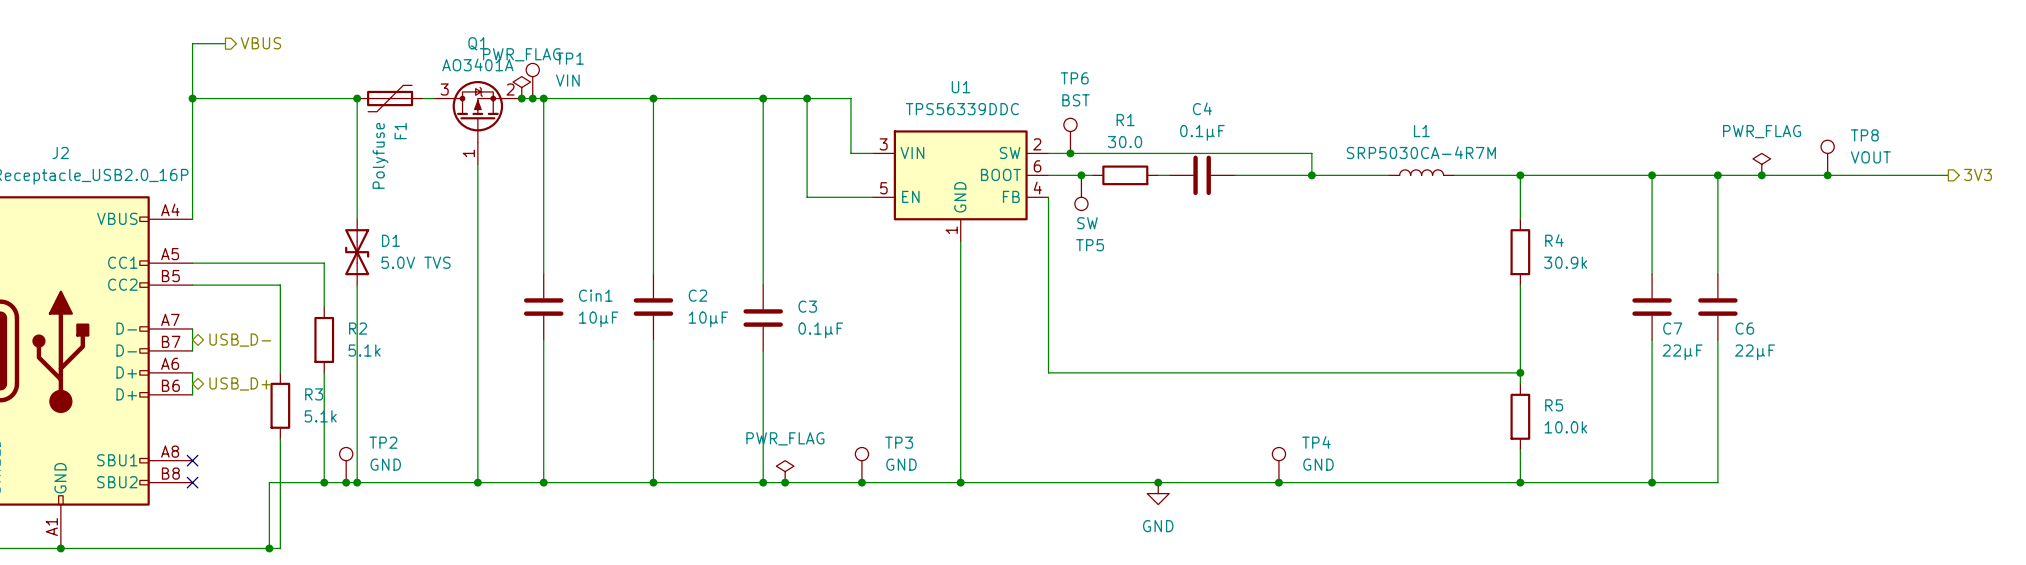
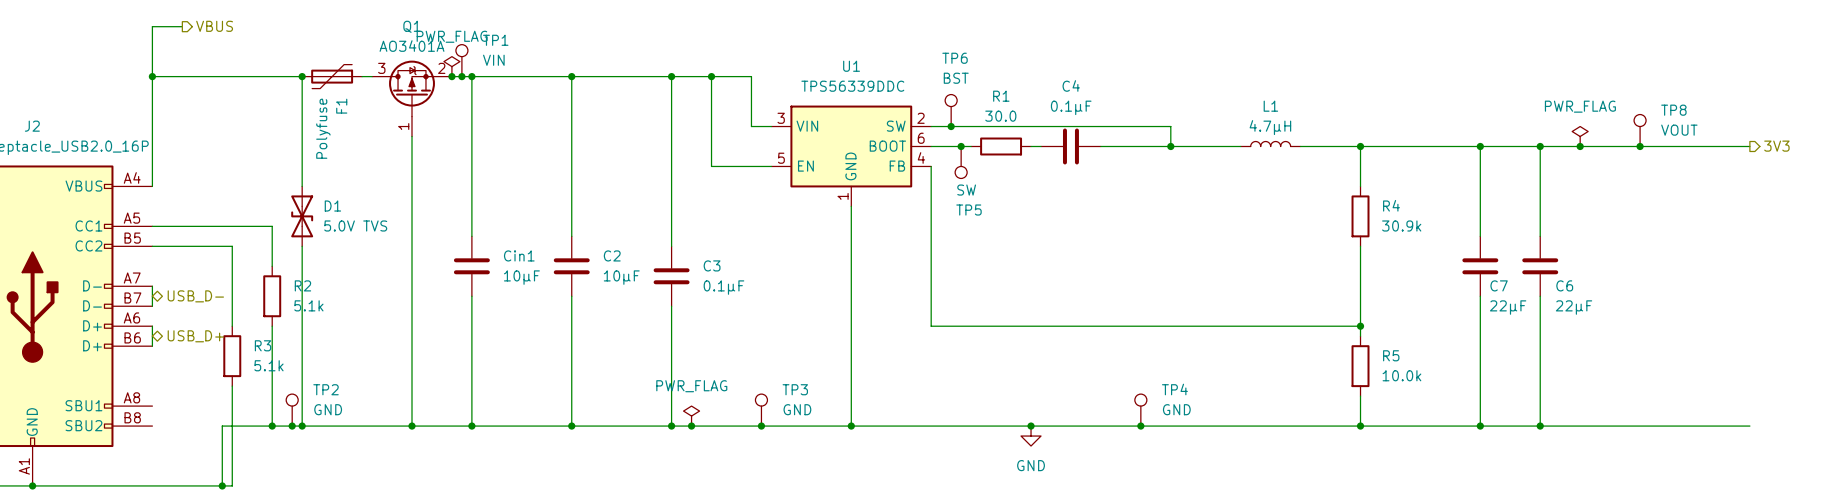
L1 value: SRP5030CA-4R7M (1421, 152) -> 4.7µH (1270, 127)
no-connect mark: (192, 460) -> none
no-connect mark: (192, 482) -> none
wire: none -> (1540, 426) (1749, 426)
junction: none -> (1540, 426)

